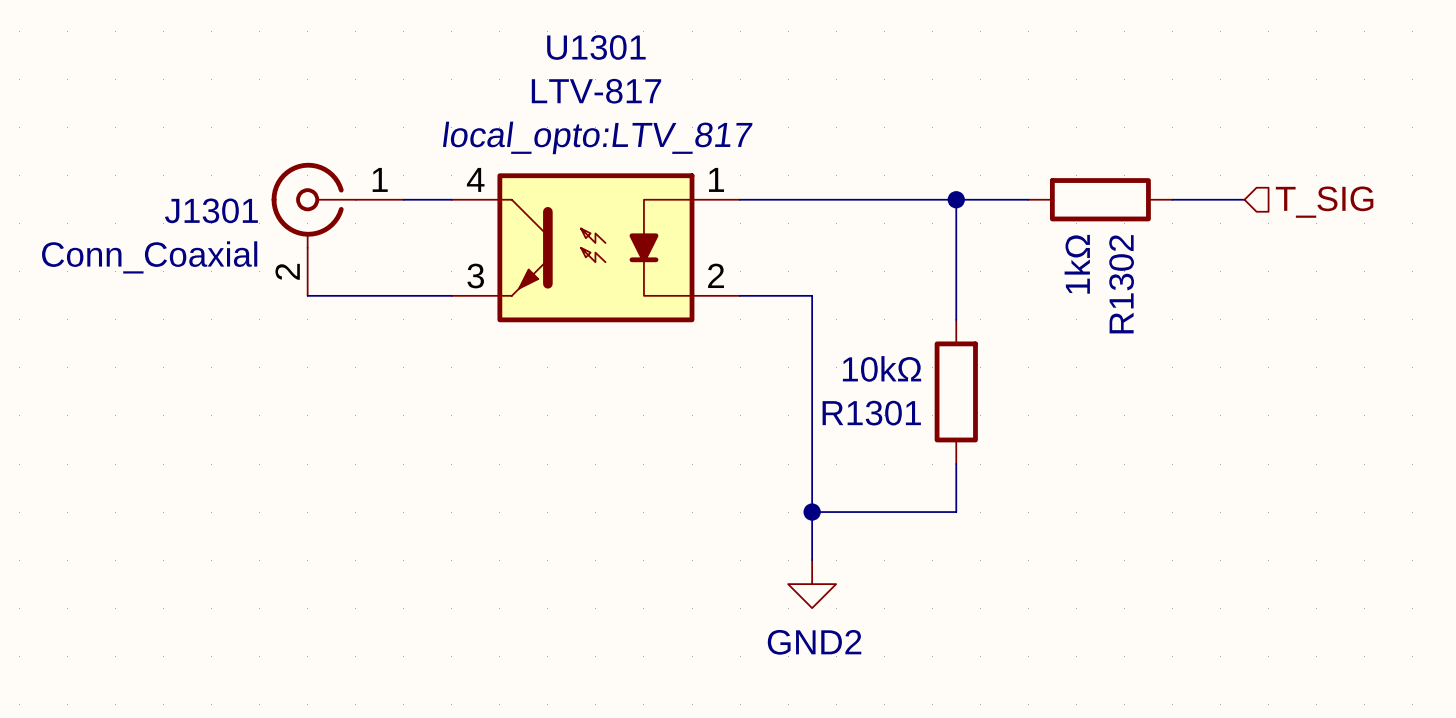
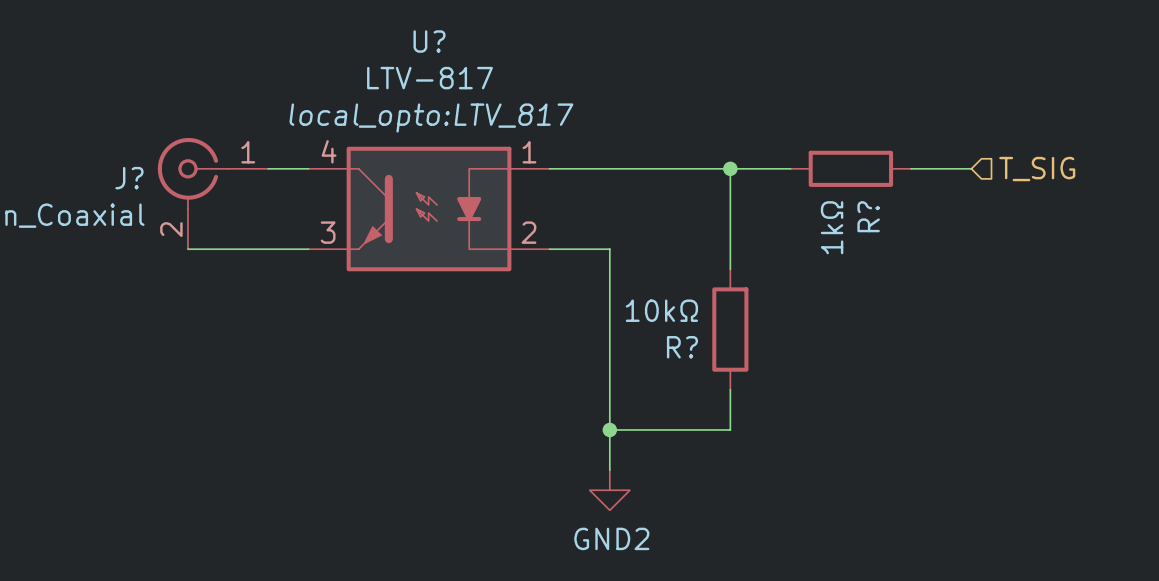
U1301 name: U1301 (596, 47) -> U? (429, 41)
J1301 name: J1301 (211, 210) -> J? (129, 178)
R1302 name: R1302 (1121, 284) -> R? (868, 216)
R1301 name: R1301 (871, 413) -> R? (682, 347)

